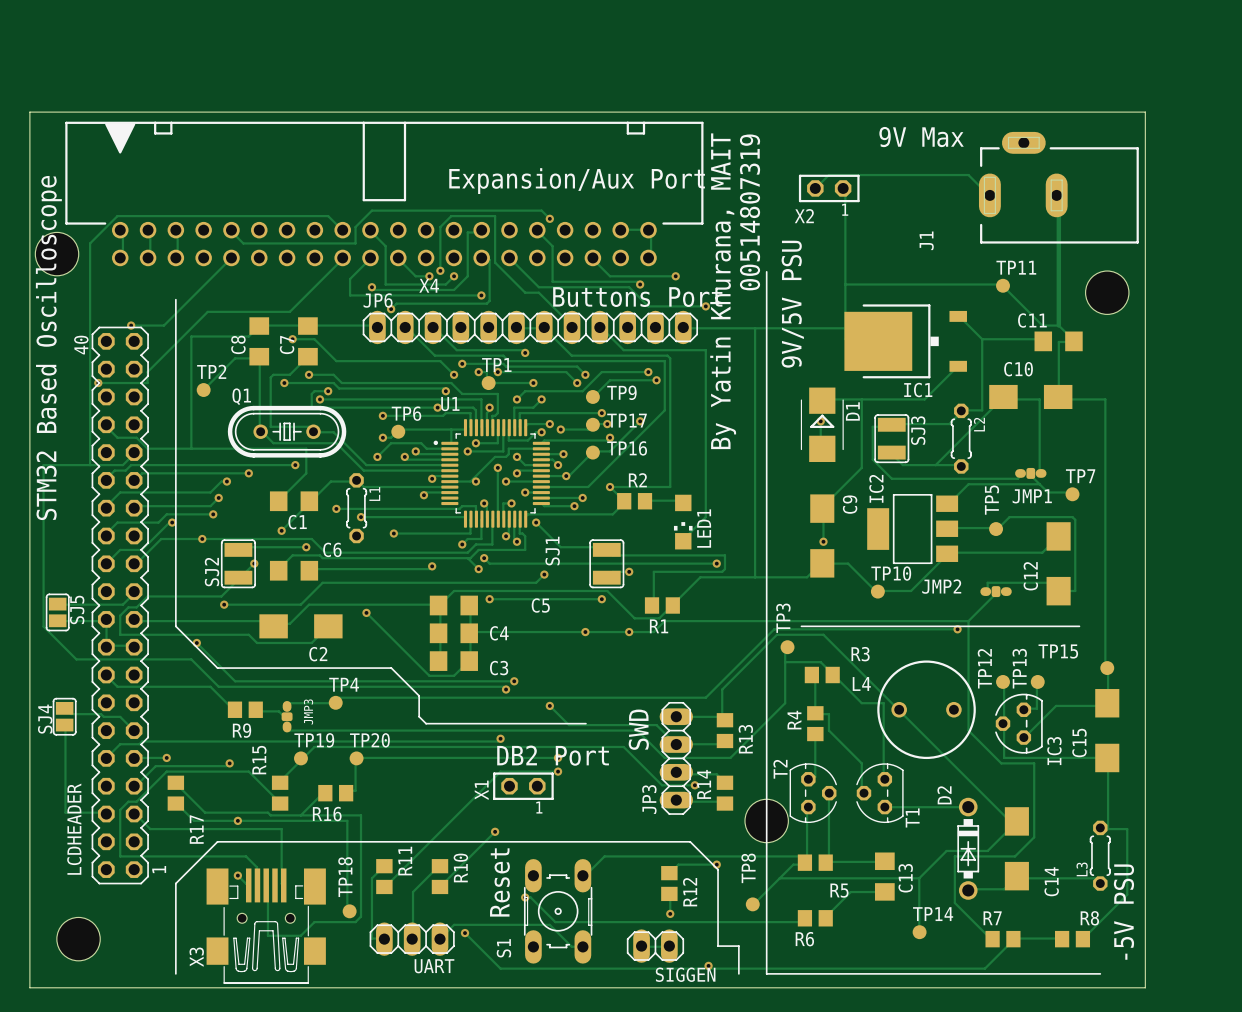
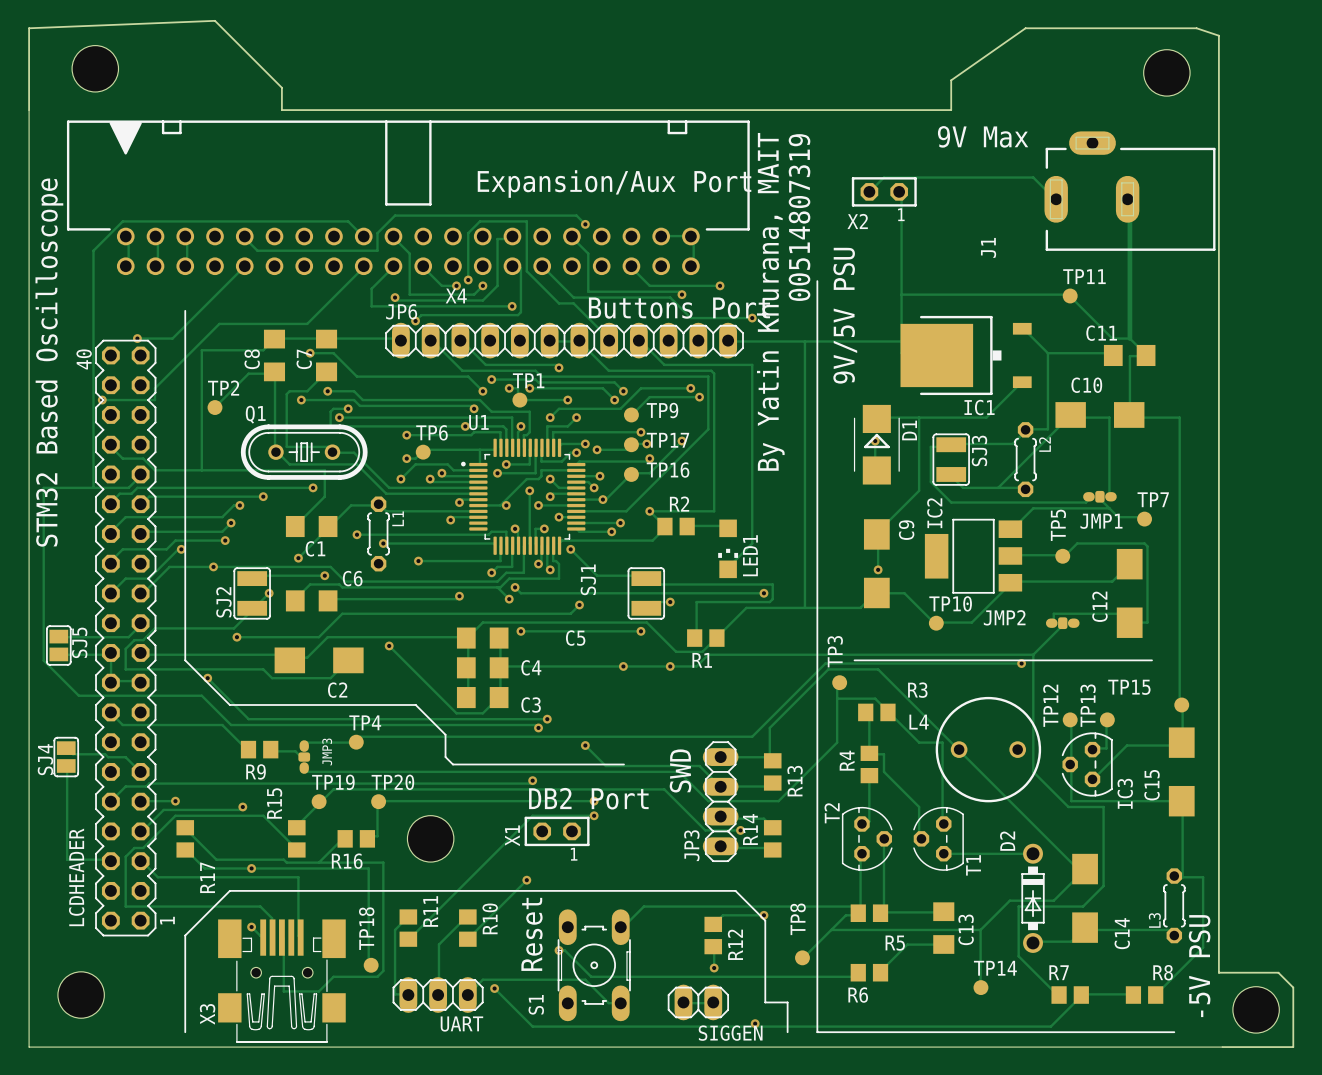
board edge: (29, 112) (1145, 112) (1145, 987) -> (29, 110) (29, 28) (215, 20) (281, 87) (281, 110) (951, 110) (951, 80) (1025, 28) (1196, 28) (1218, 35) (1218, 972) (1278, 972) (1293, 987) (1293, 1047) (1222, 1047)
part position: (57, 254) -> (95, 68)
part position: (1107, 292) -> (1166, 72)
part: none -> (430, 838)
part: (766, 820) -> none
part: none -> (1256, 1009)

